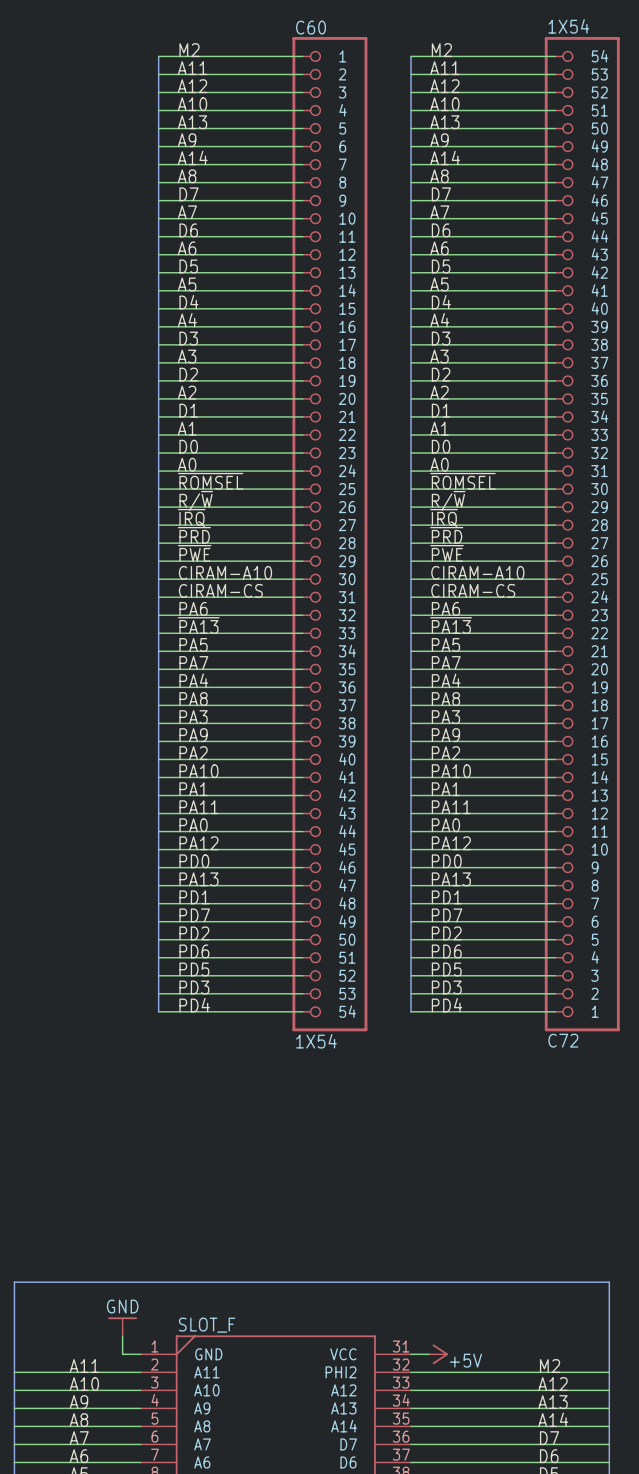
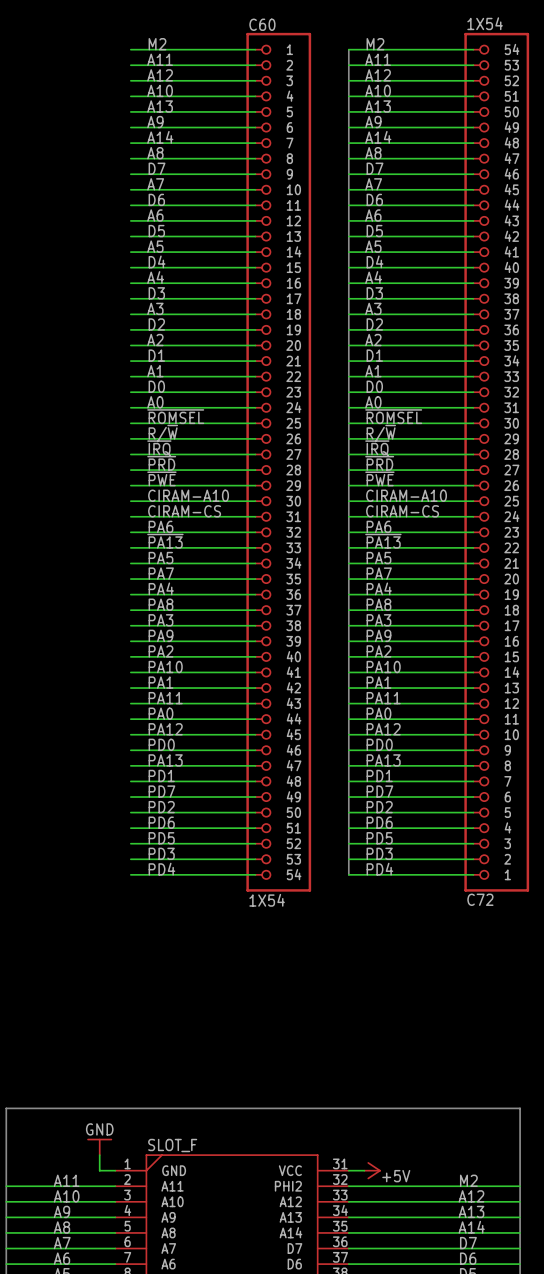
bus: (158, 56) (158, 1011) -> none

